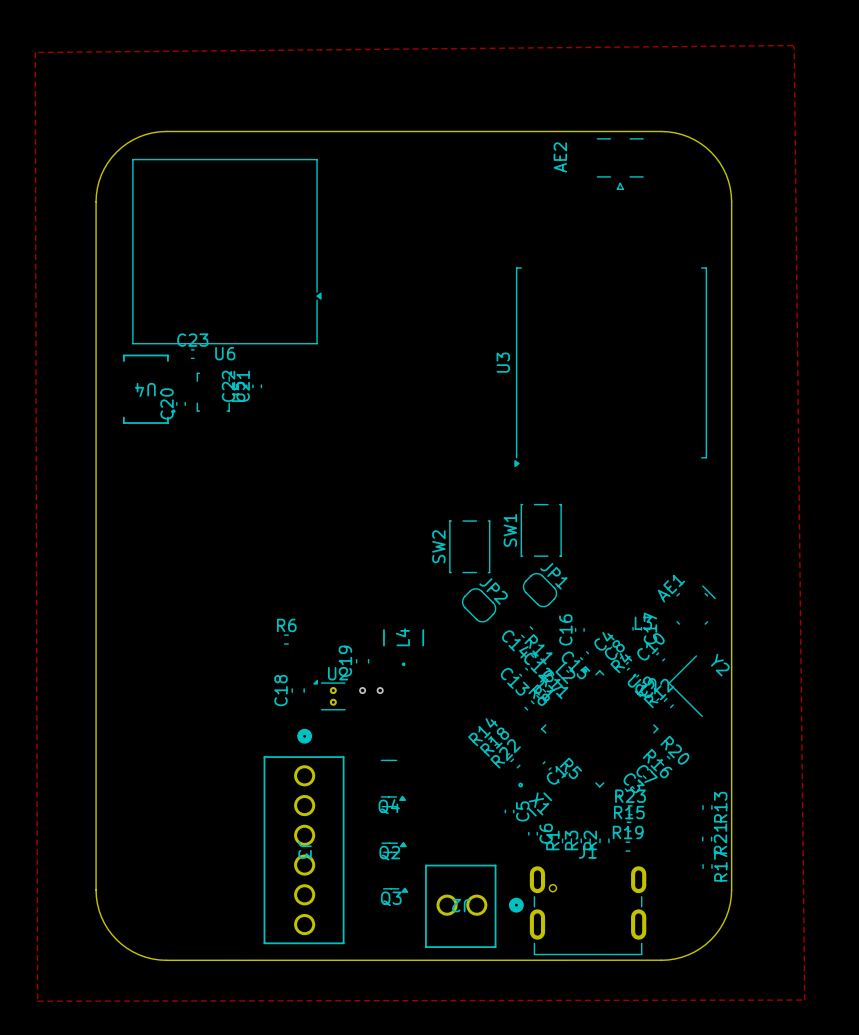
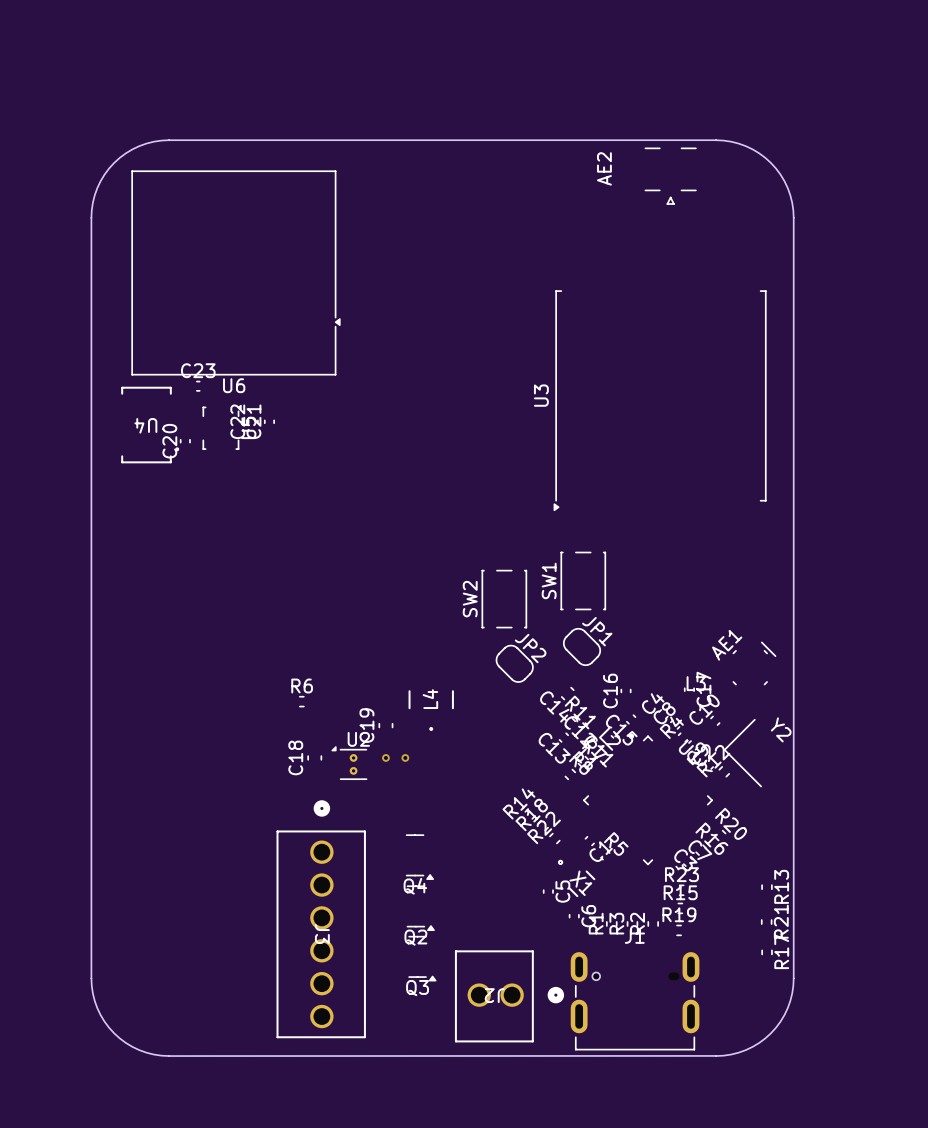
zone outline: (793, 45) (804, 1000) (37, 1001) (35, 52) (793, 45) -> none

